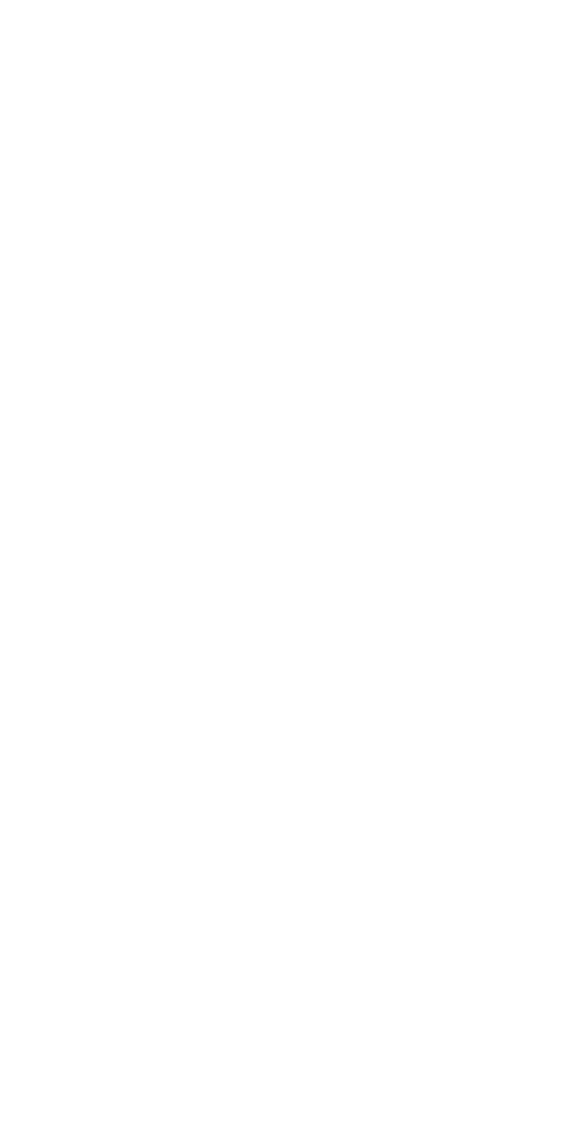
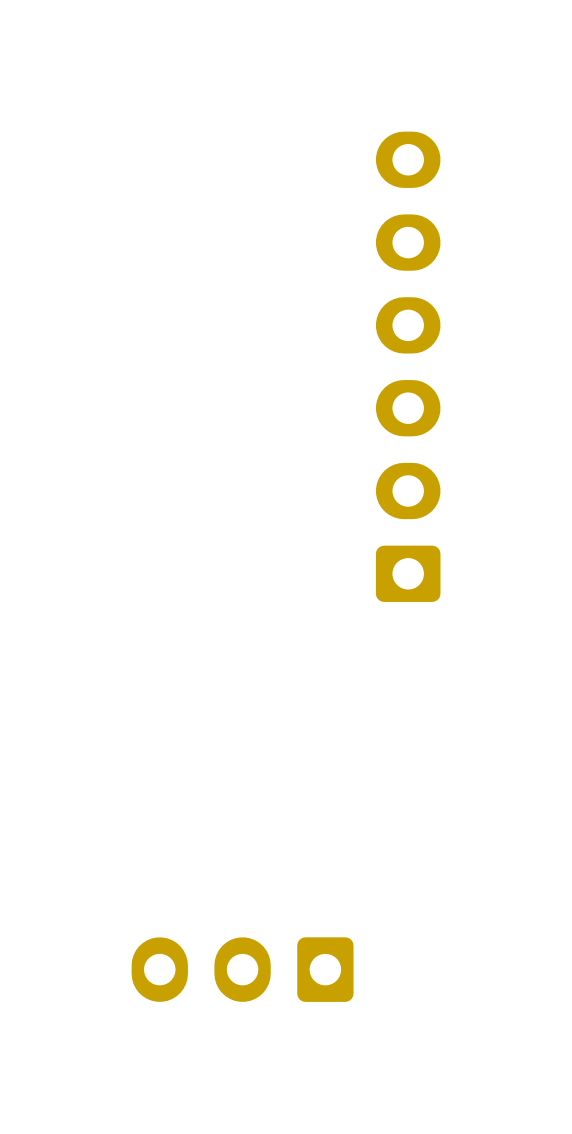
part: none -> (408, 366)
part: none -> (242, 969)

